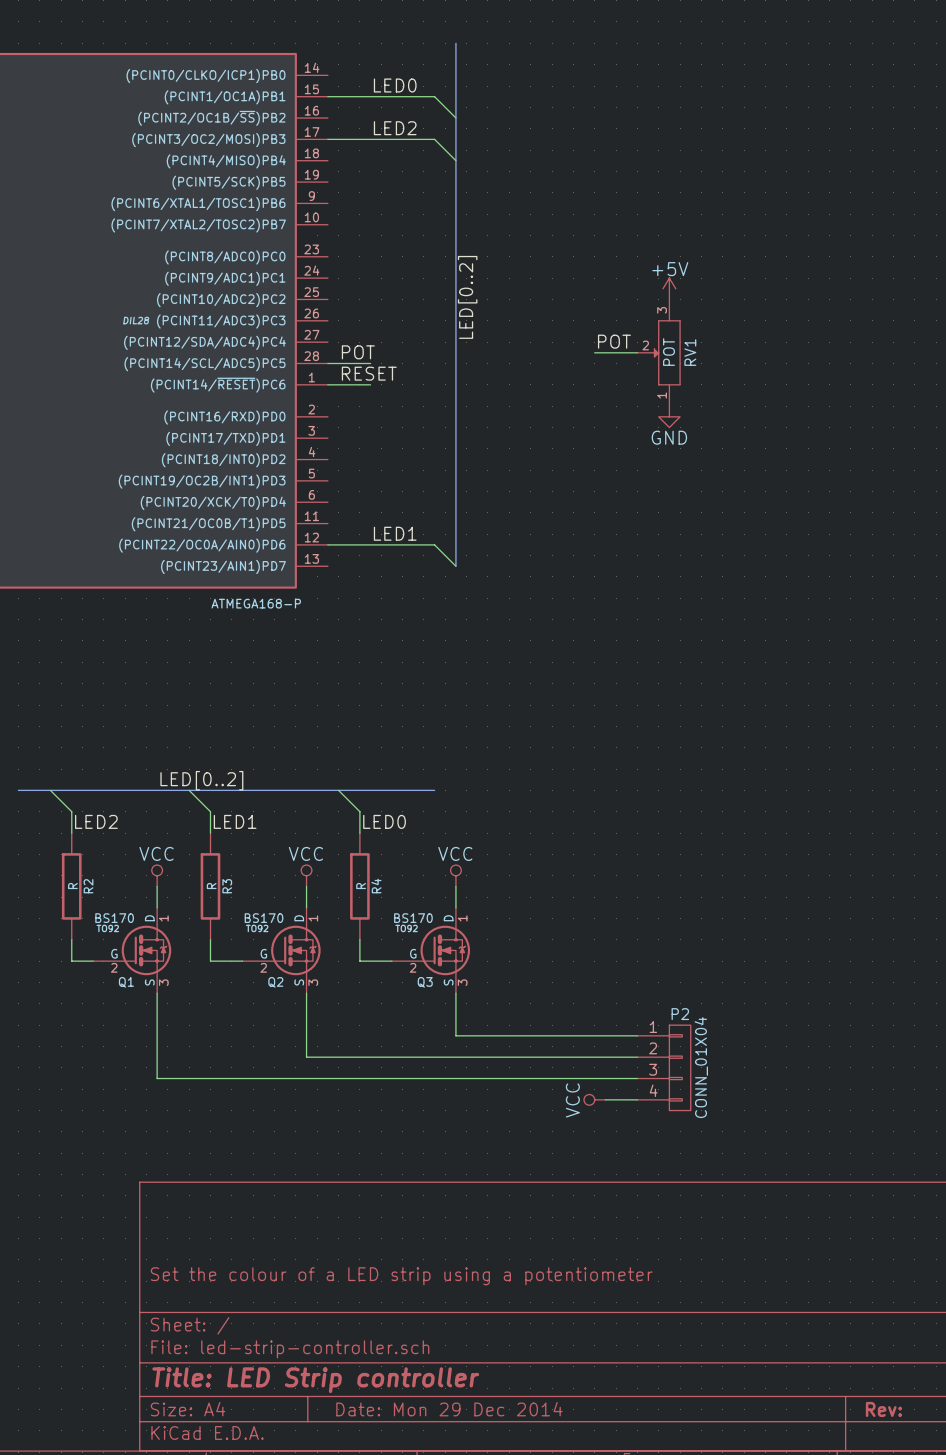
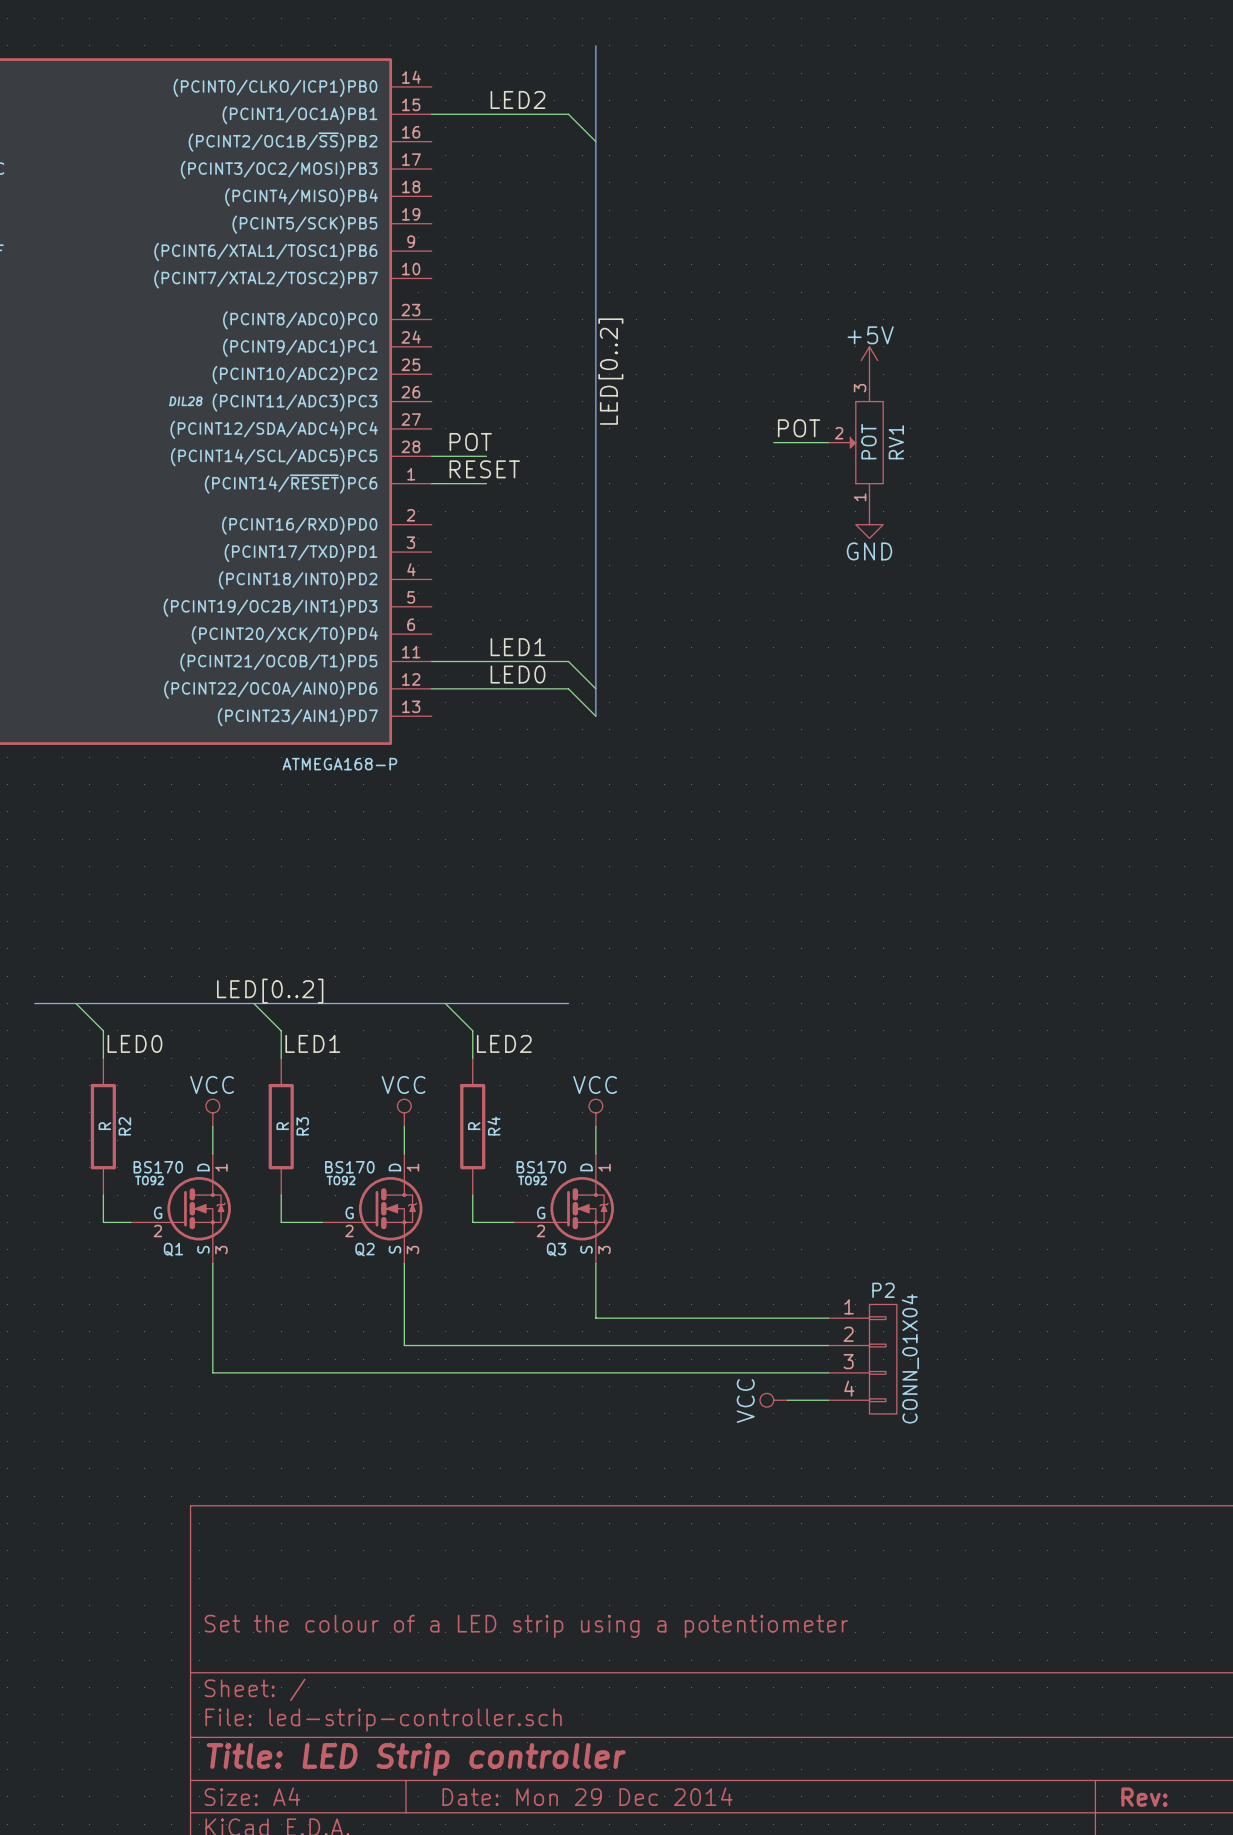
label: LED0 (395, 85) -> LED2 (518, 99)
label: LED2 (395, 128) -> none
wire: (327, 139) (434, 139) (455, 160) -> none
label: none -> LED1 (518, 647)
wire: none -> (431, 661) (568, 661) (595, 688)
label: LED1 (395, 533) -> LED0 (518, 674)
label: LED2 (96, 821) -> LED0 (134, 1043)
label: LED0 (384, 821) -> LED2 (504, 1043)

